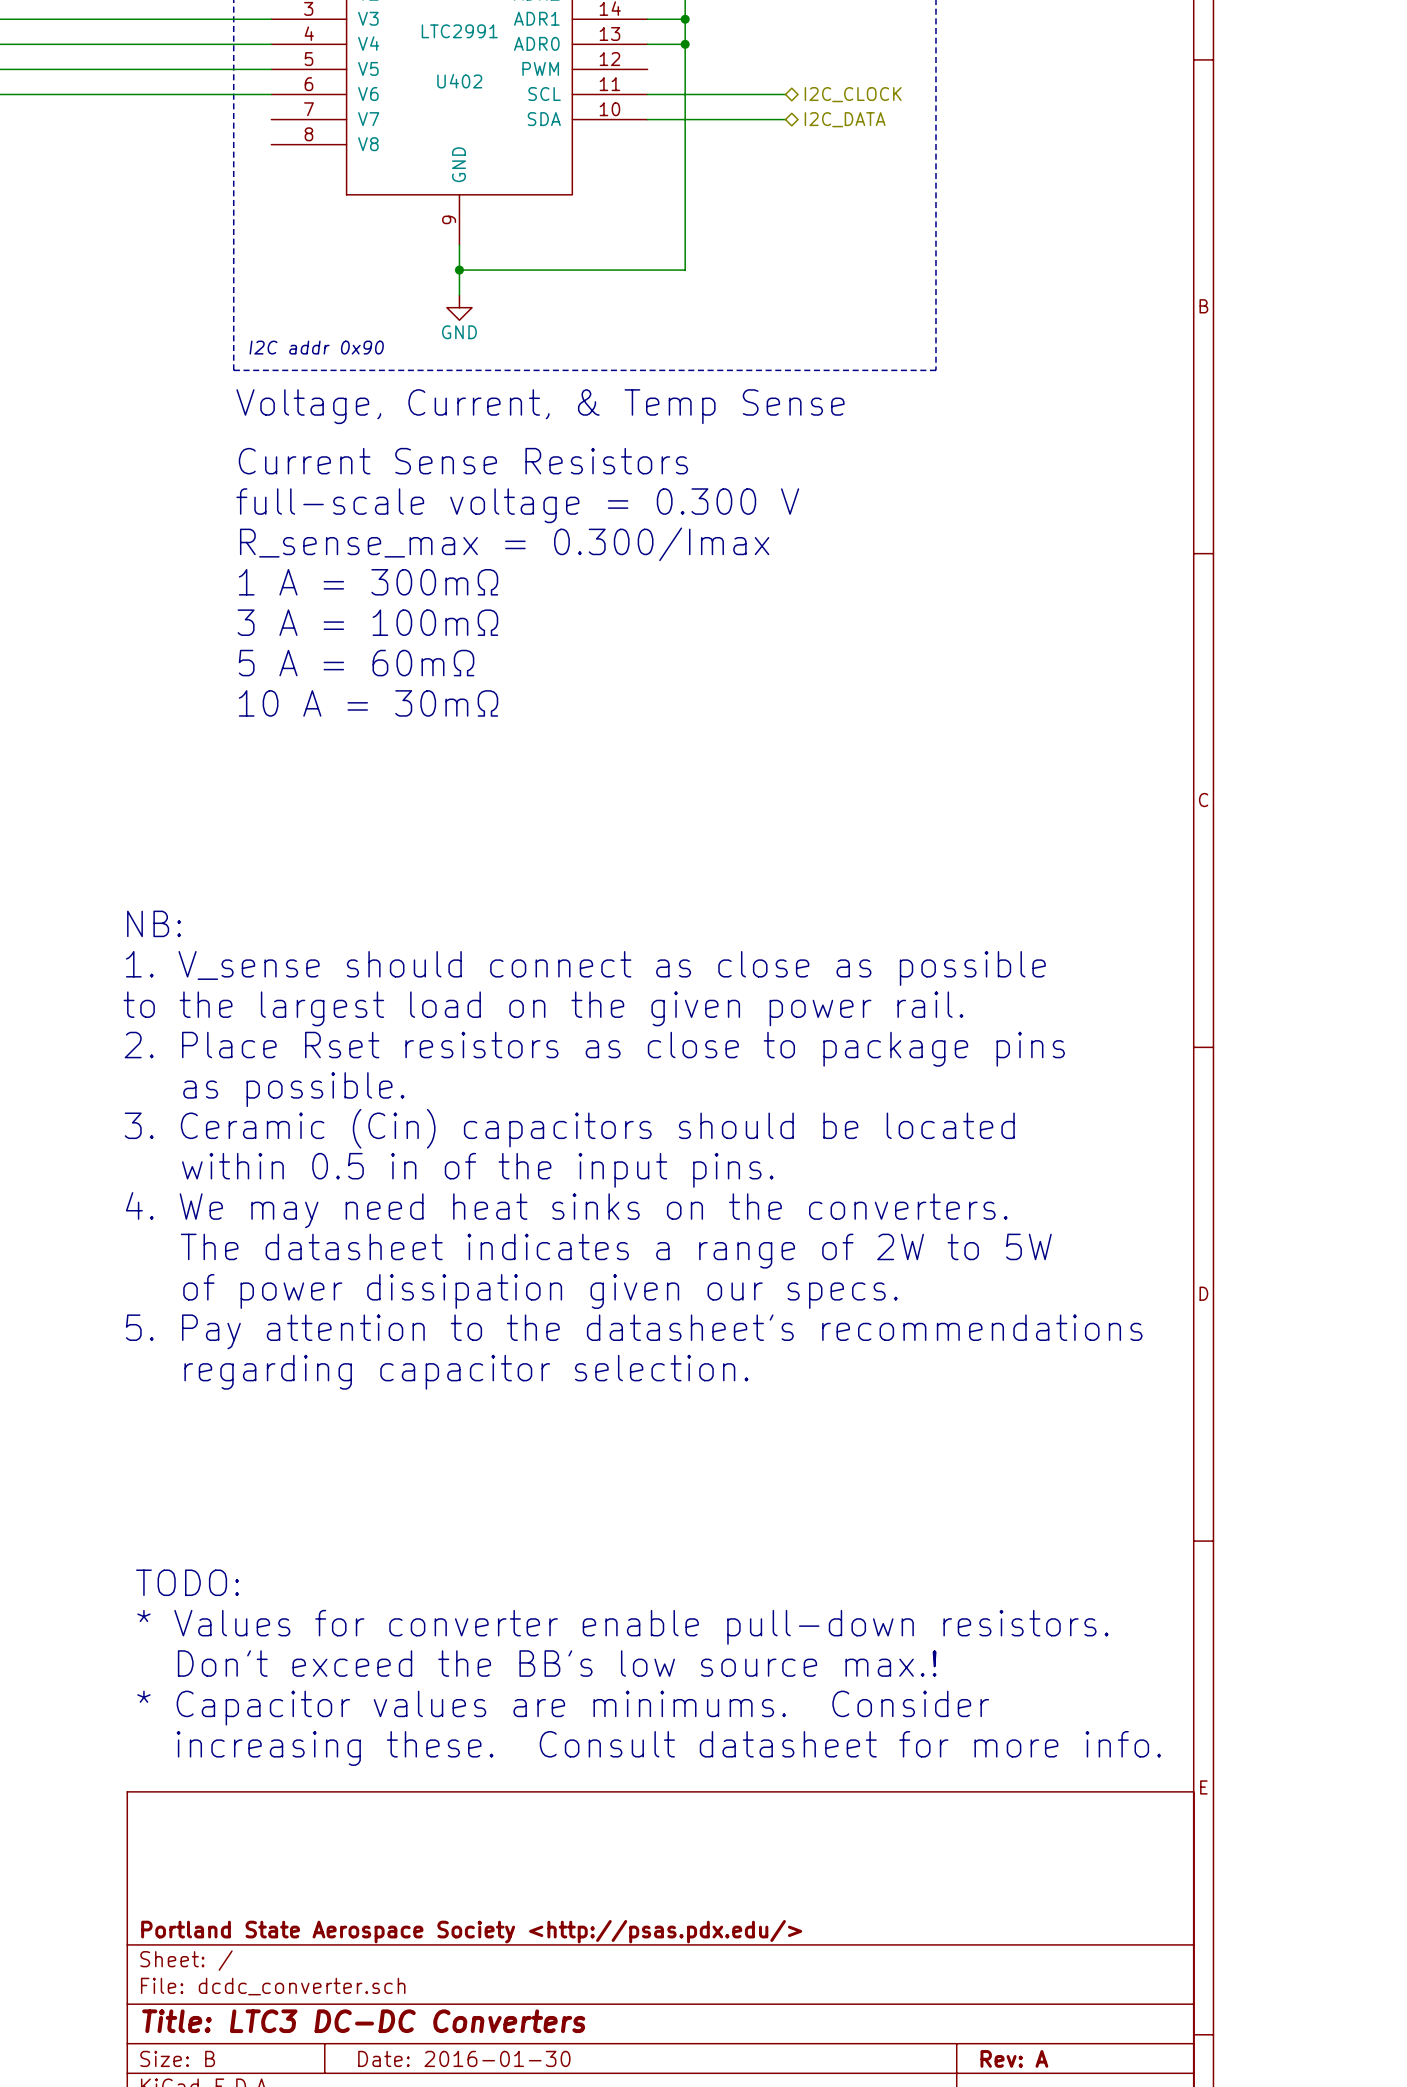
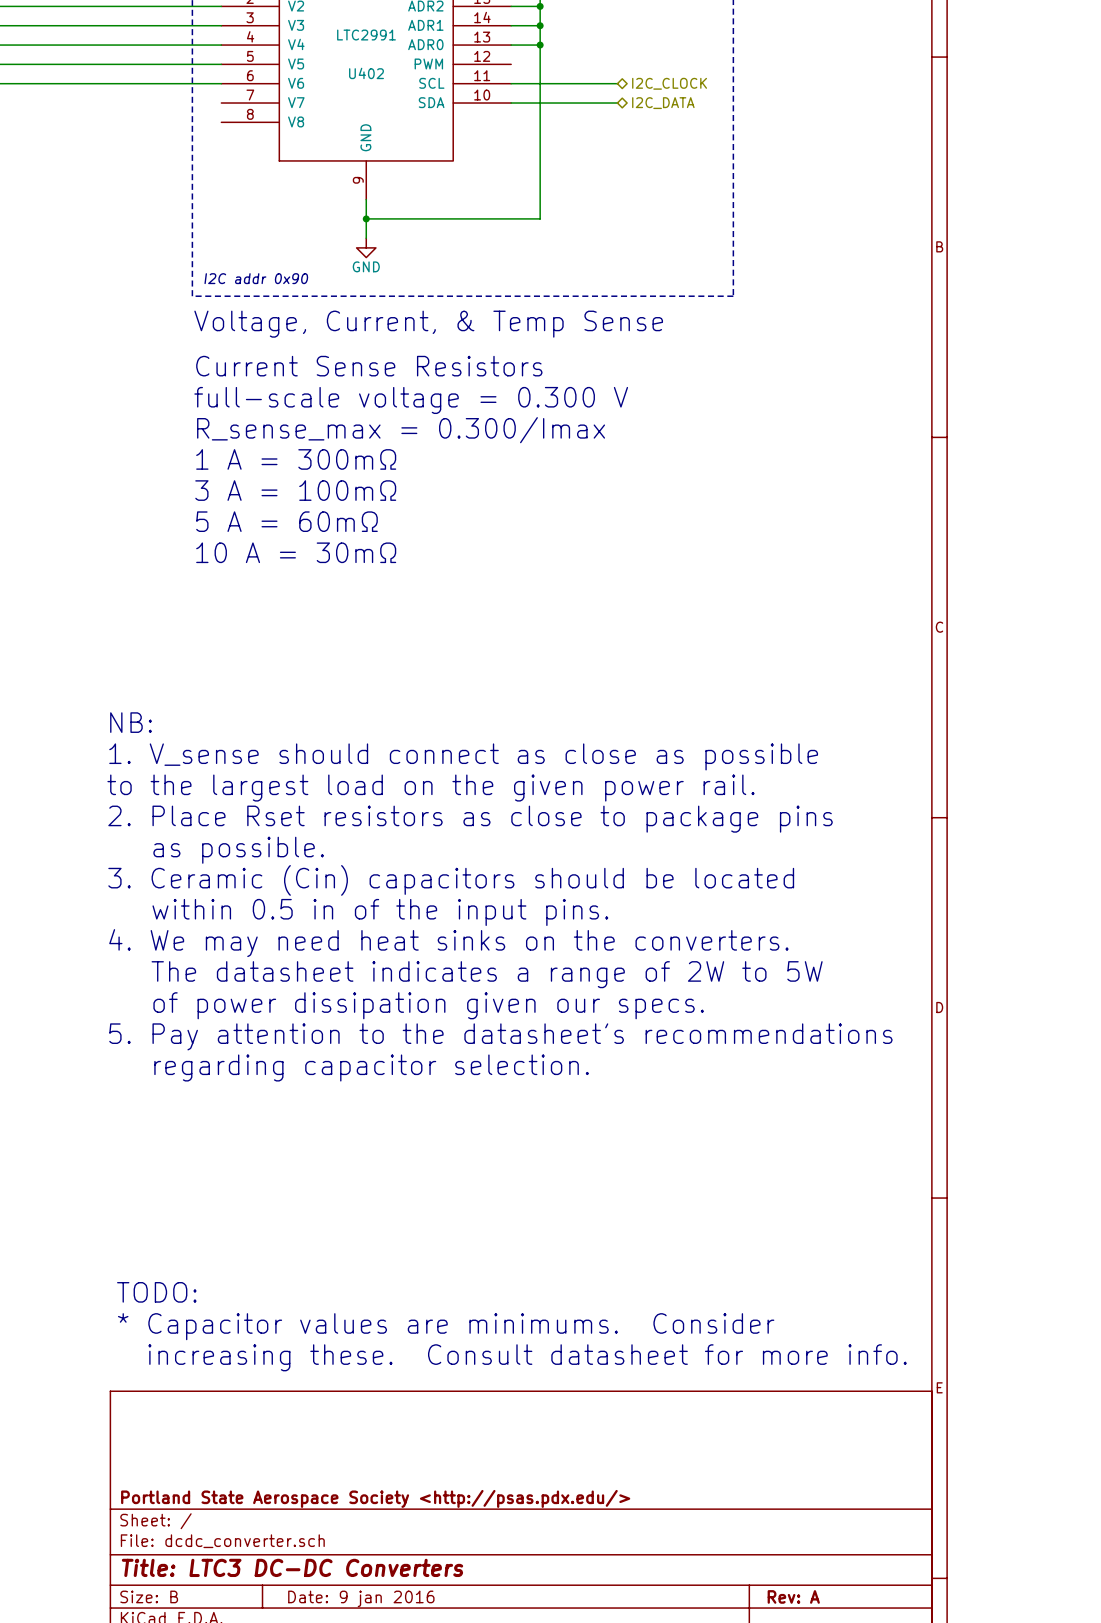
text: TODO: (187, 1582) -> none
text: * Values for converter enable pull-down resistors. (622, 1627) -> none
text: Don't exceed the BB's low source max.! (557, 1663) -> TODO: (156, 1292)
title block: Date: 2016-01-30 (464, 2058) -> Date: 9 jan 2016 (361, 1598)

